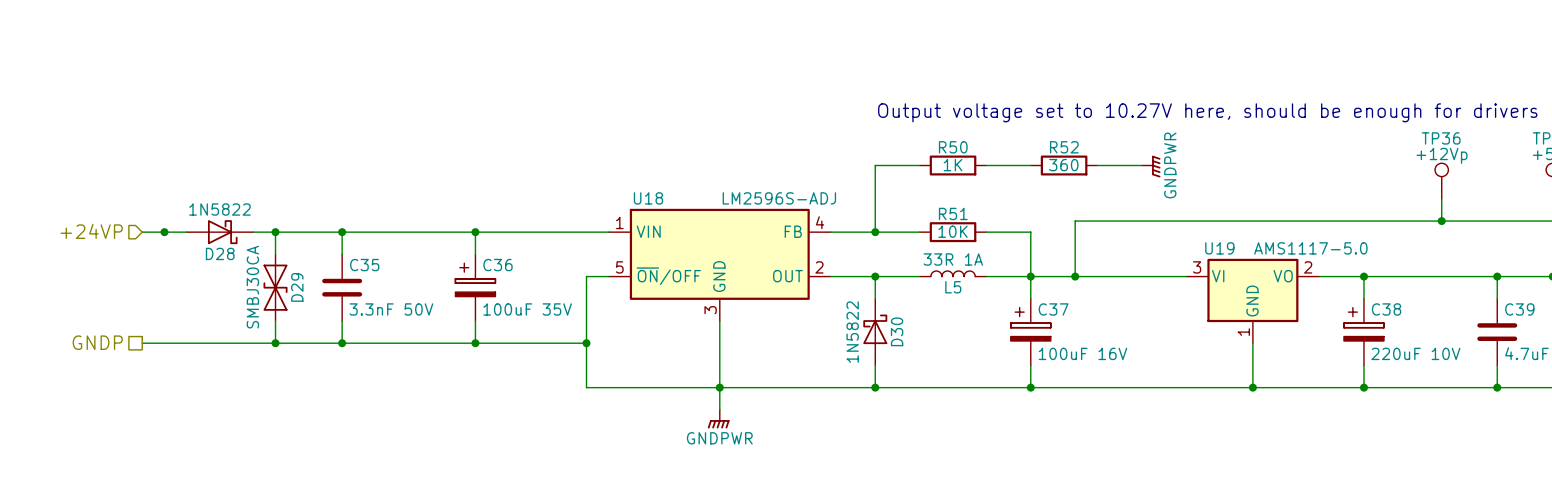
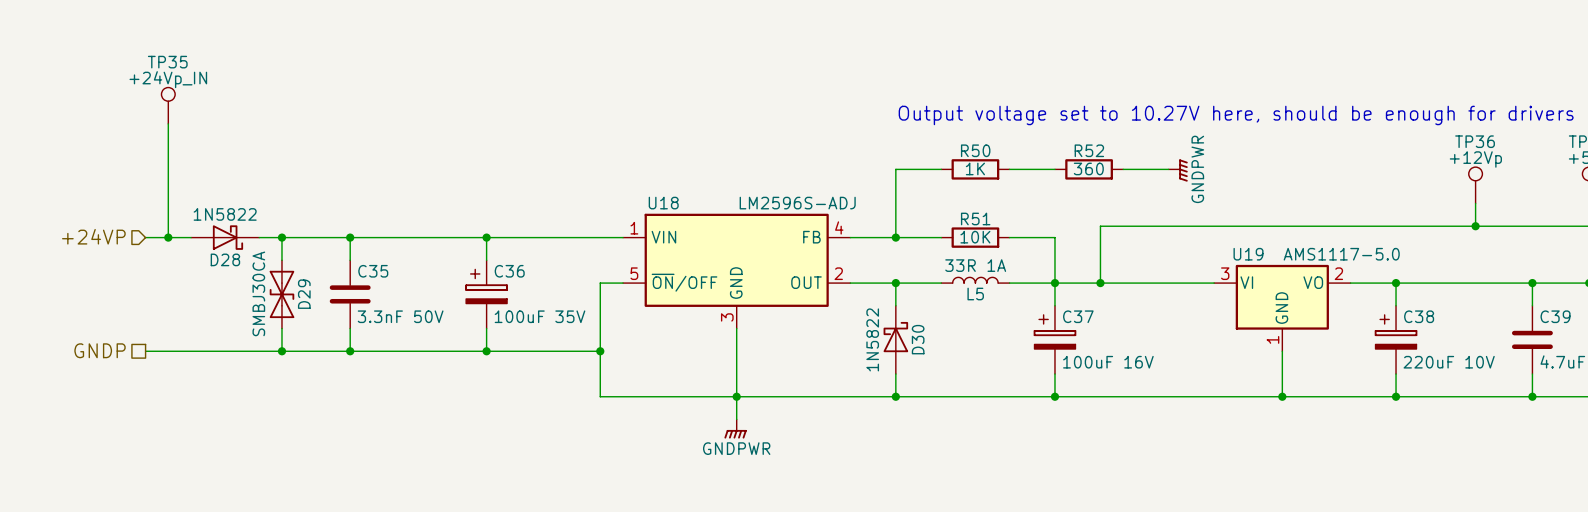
TP35: none -> +24Vp_IN (168, 105)
wire: none -> (168, 123) (168, 237)

